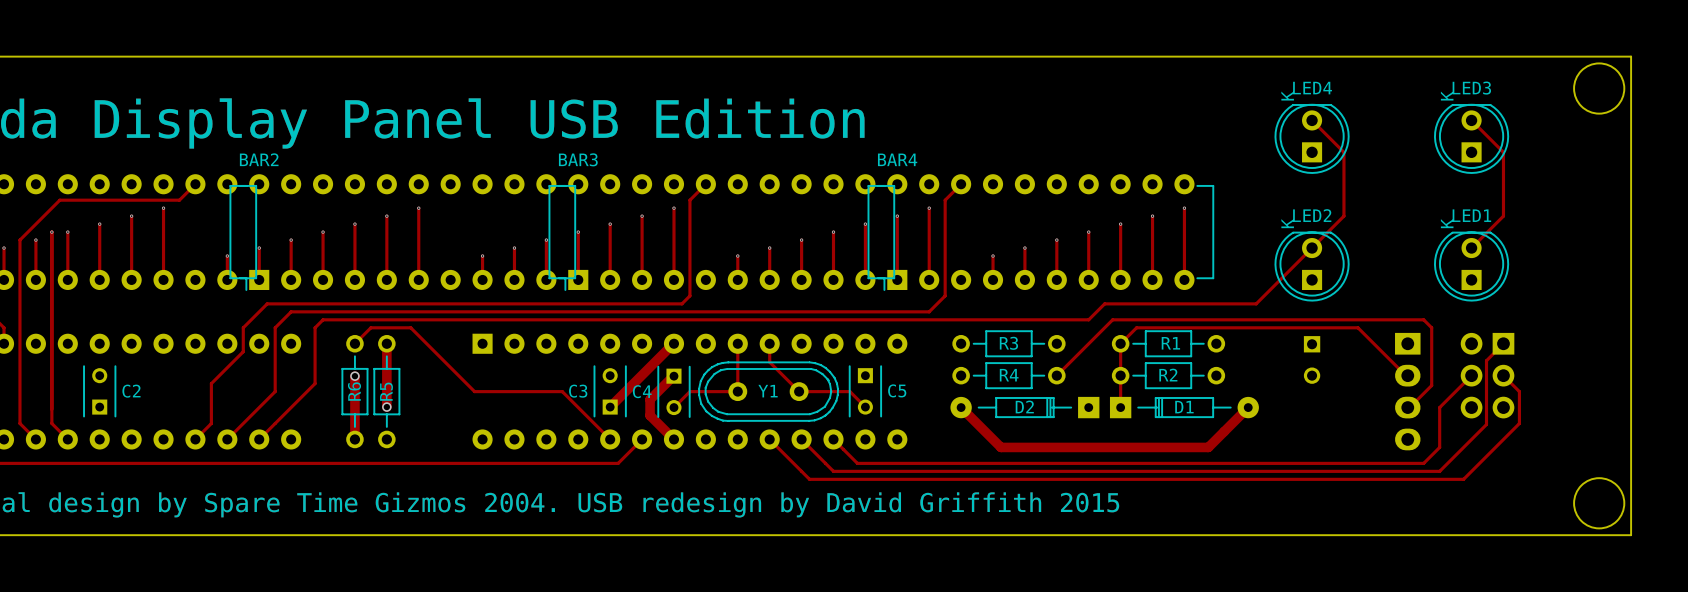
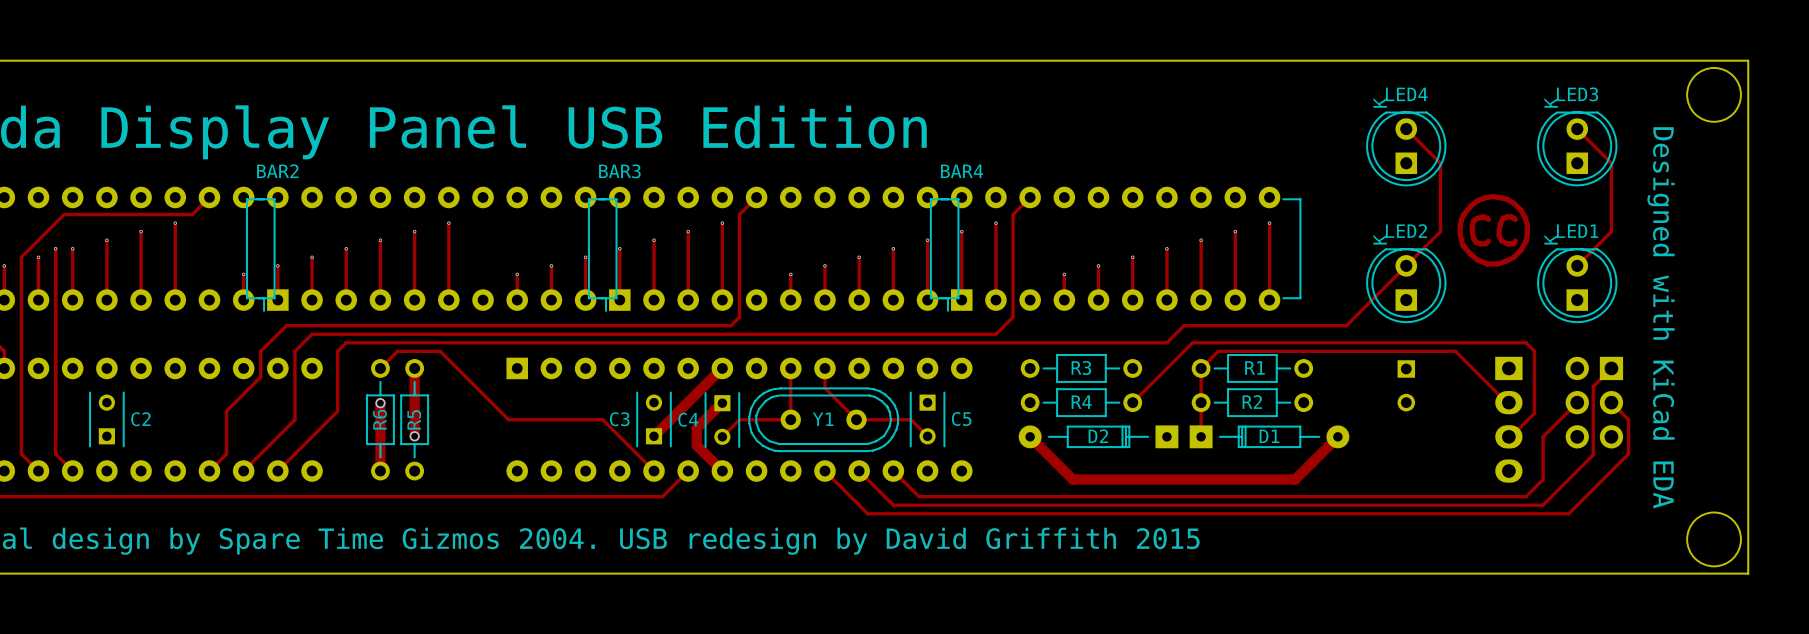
drawing: none -> [1457, 194, 1531, 267]
text: none -> Designed with KiCad EDA (1660, 317)

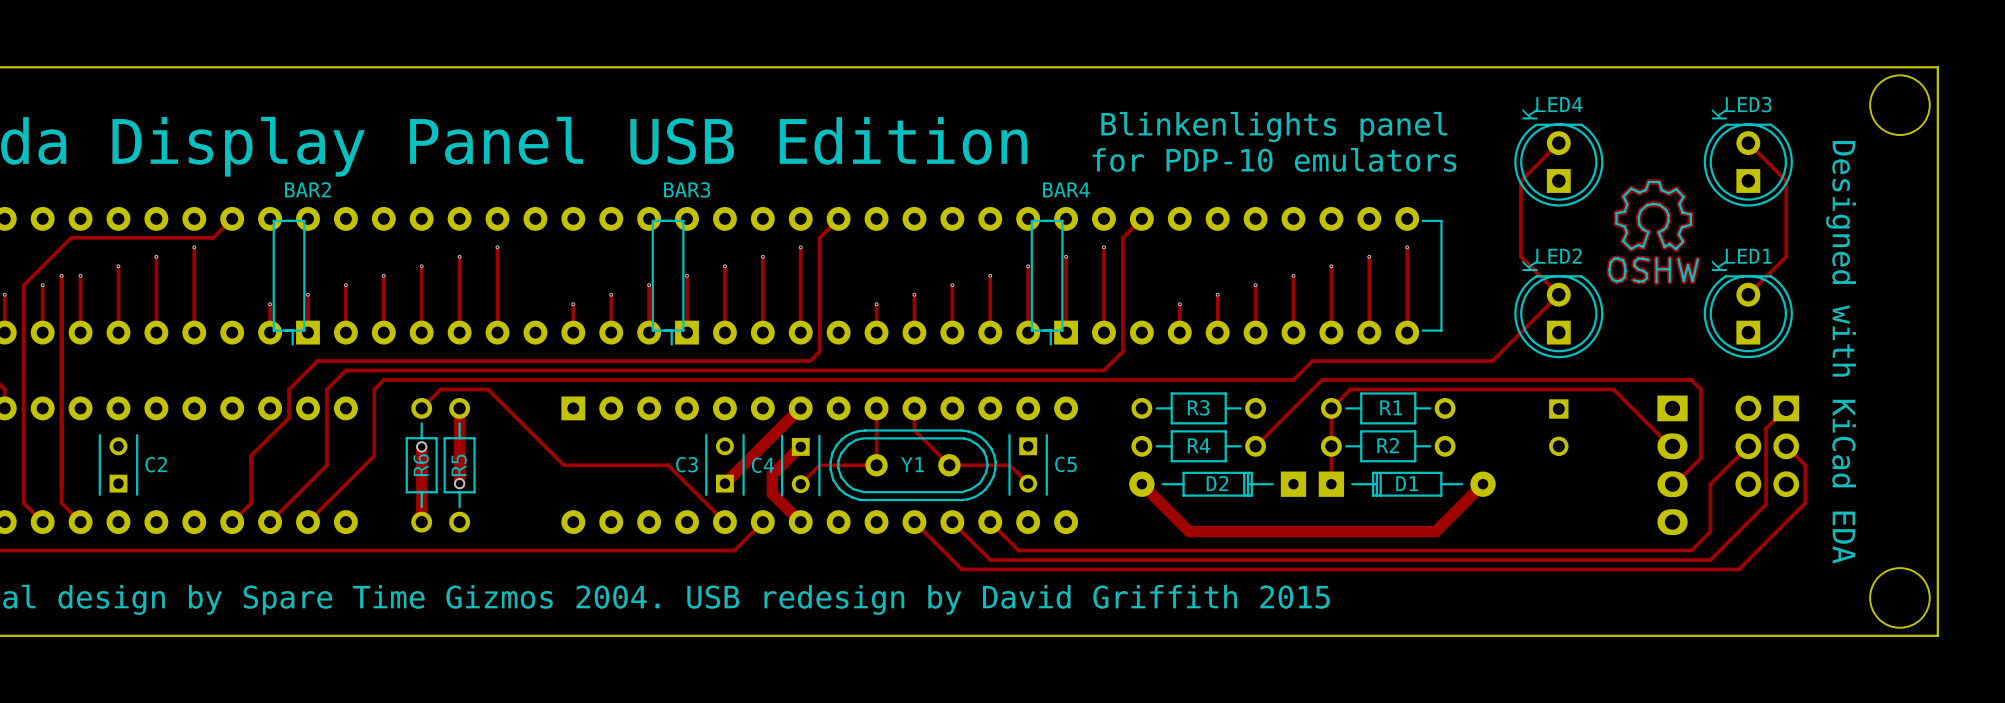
text: none -> Blinkenlights panel (1274, 126)
track: (1406, 129) (1440, 163) (1440, 231) (1406, 265) -> (1558, 143) (1520, 180) (1520, 256) (1558, 294)
text: none -> for PDP-10 emulators (1274, 159)
drawing: none -> [1606, 179, 1701, 285]
drawing: [1457, 194, 1531, 267] -> none

